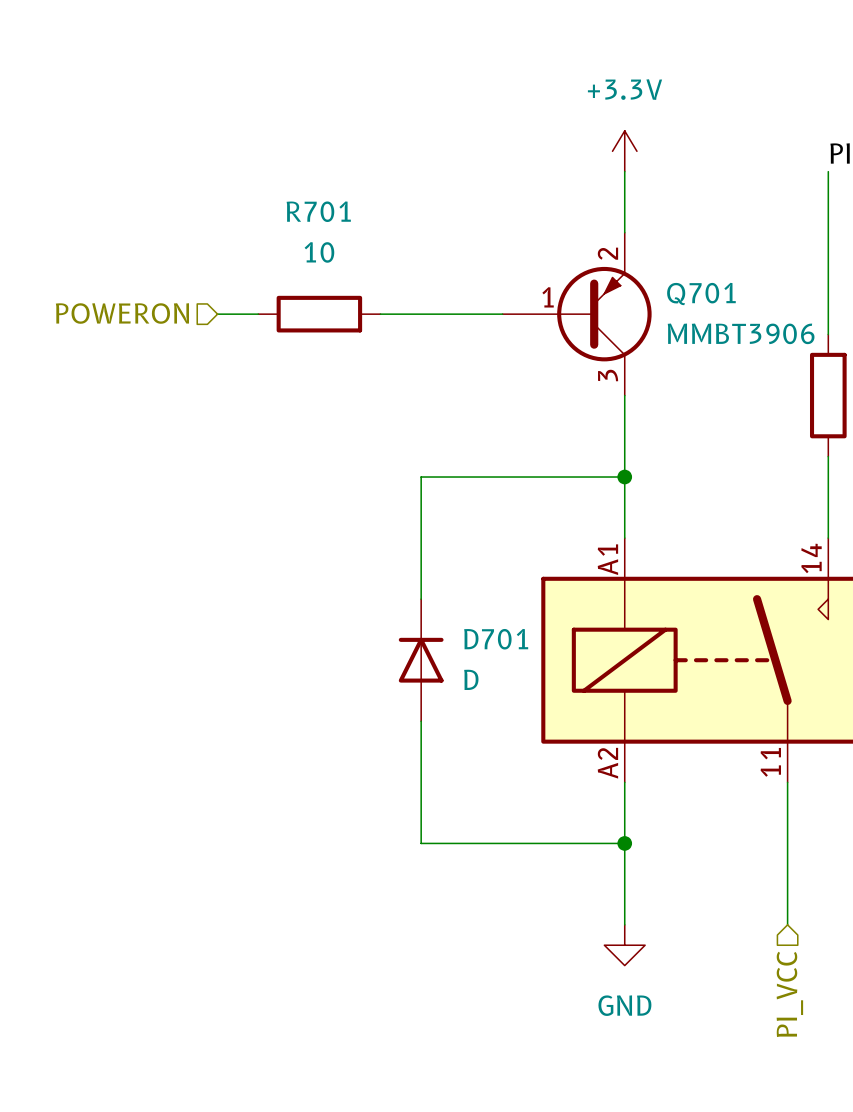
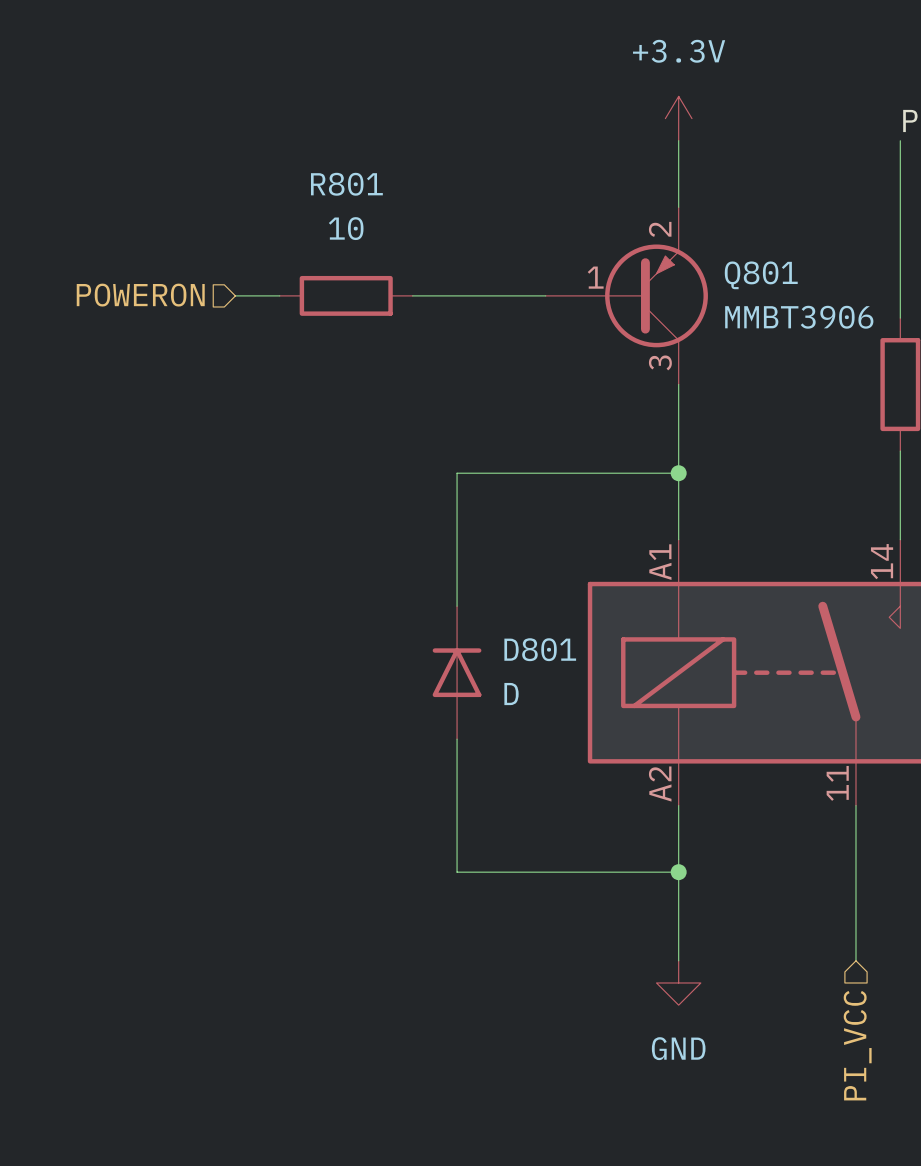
R701 name: R701 (318, 211) -> R801 (346, 184)
Q701 name: Q701 (701, 294) -> Q801 (761, 275)
D701 name: D701 (496, 639) -> D801 (540, 649)

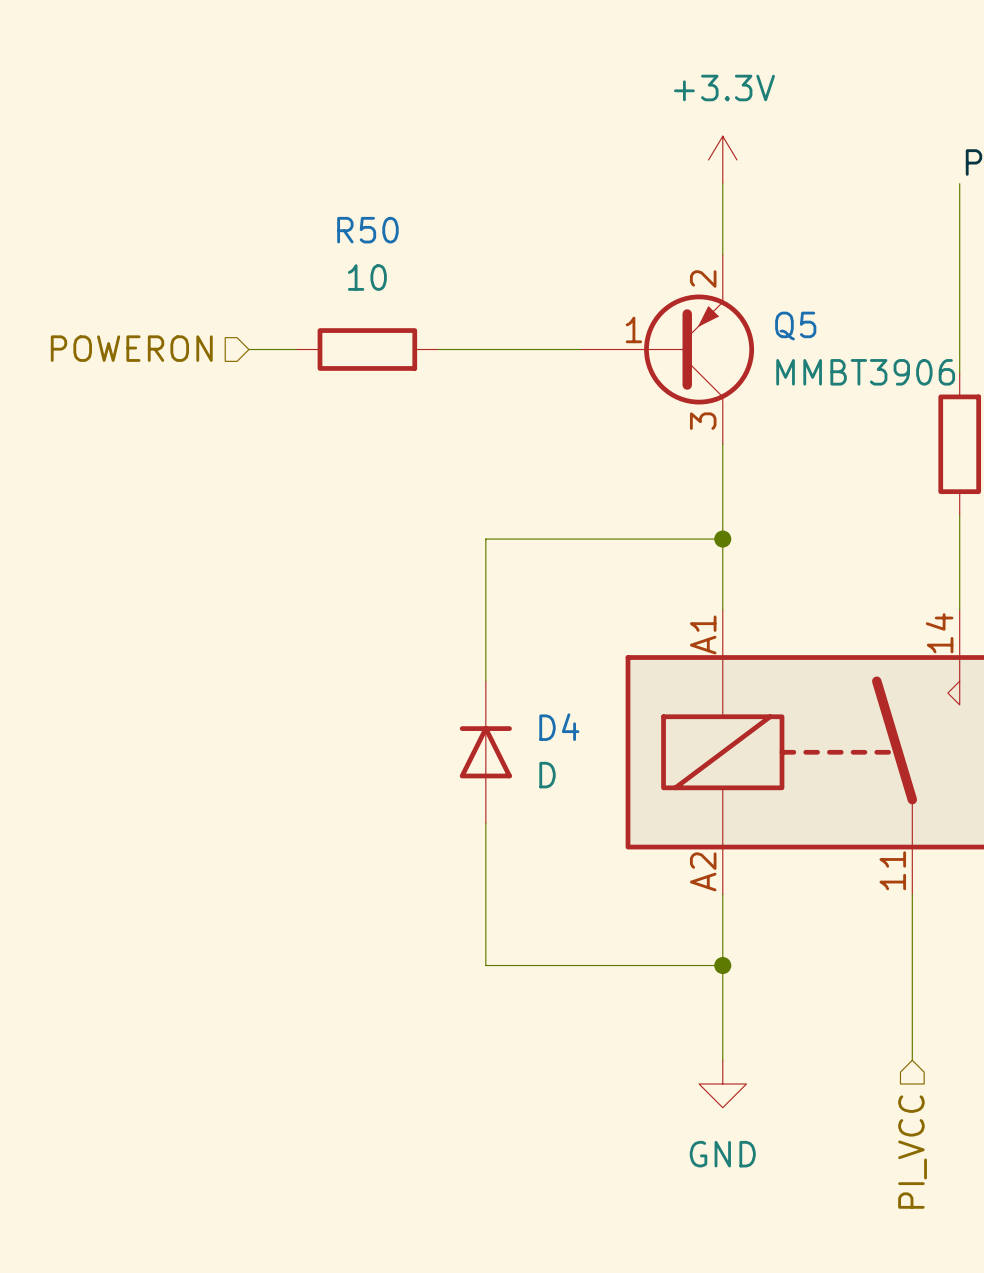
R801 name: R801 (346, 184) -> R50 (367, 230)
Q801 name: Q801 (761, 275) -> Q5 (795, 326)
D801 name: D801 (540, 649) -> D4 (559, 727)

